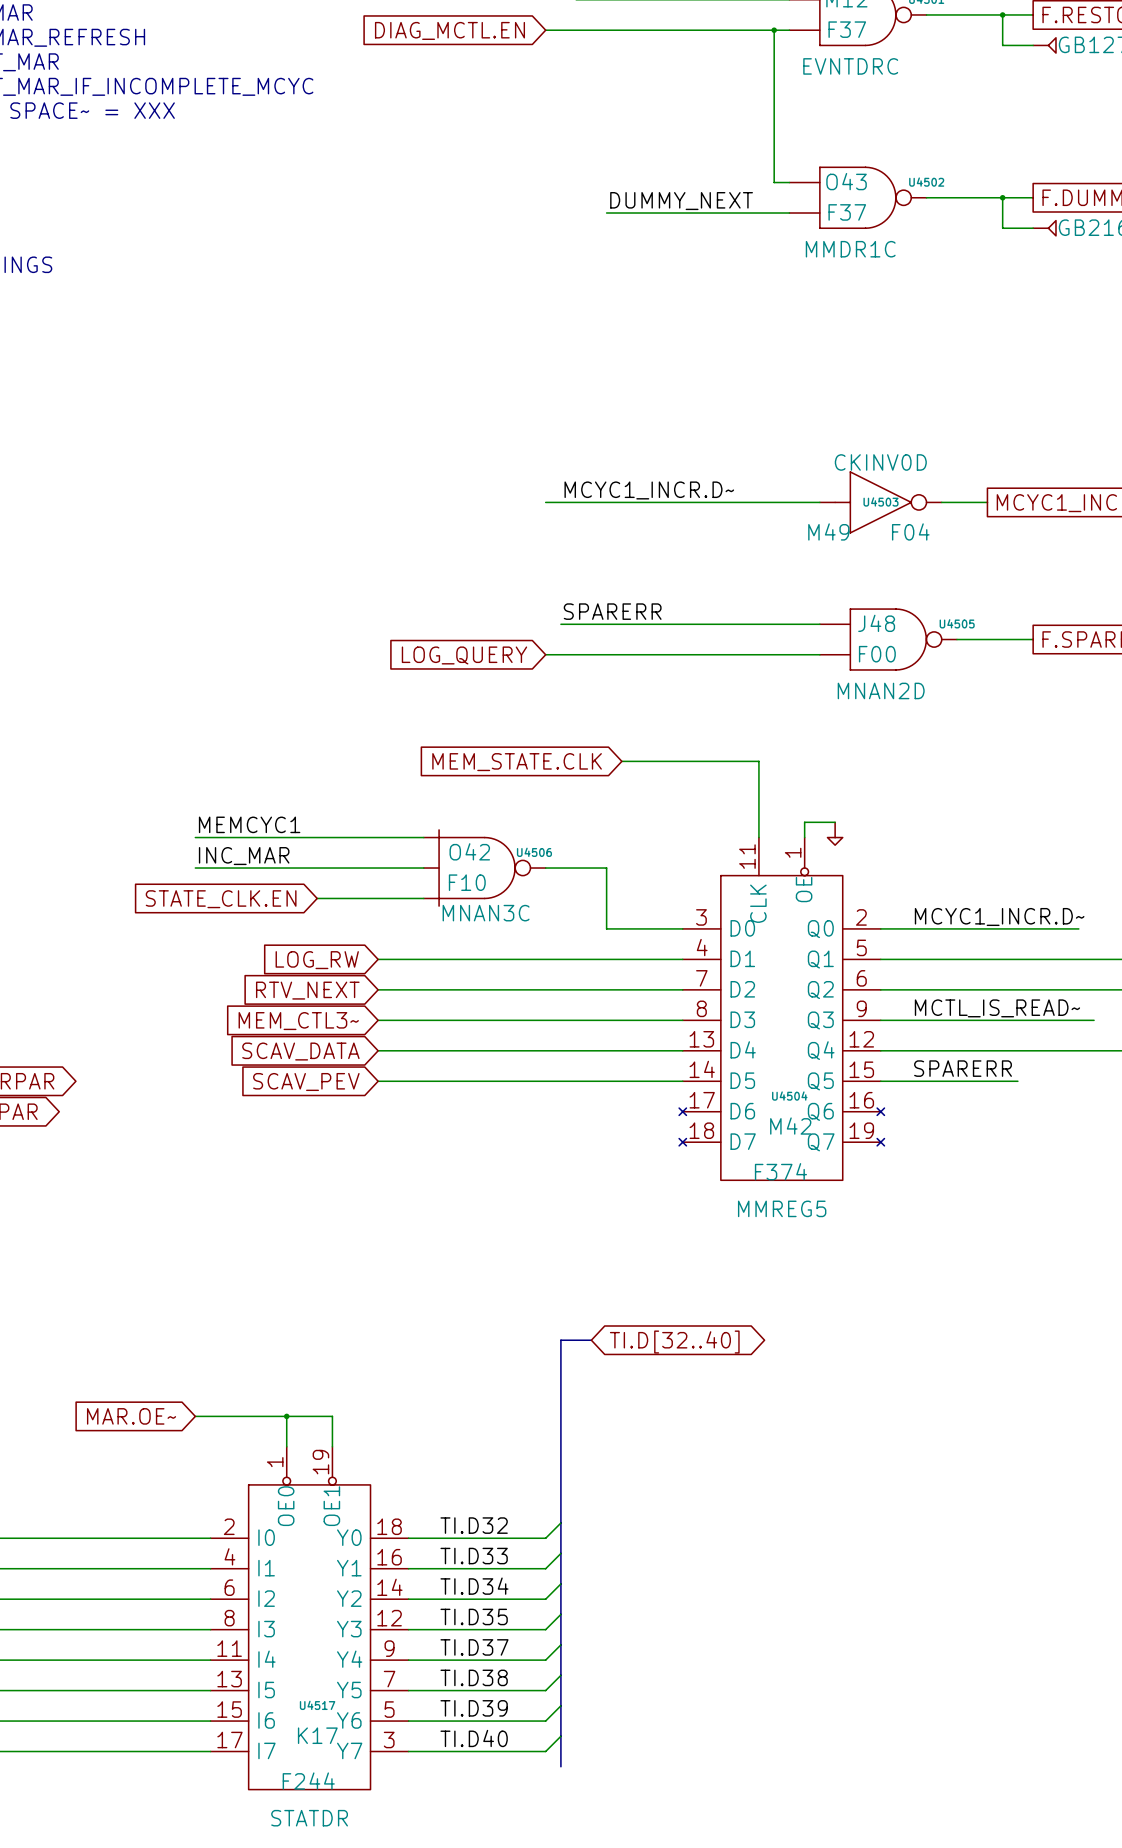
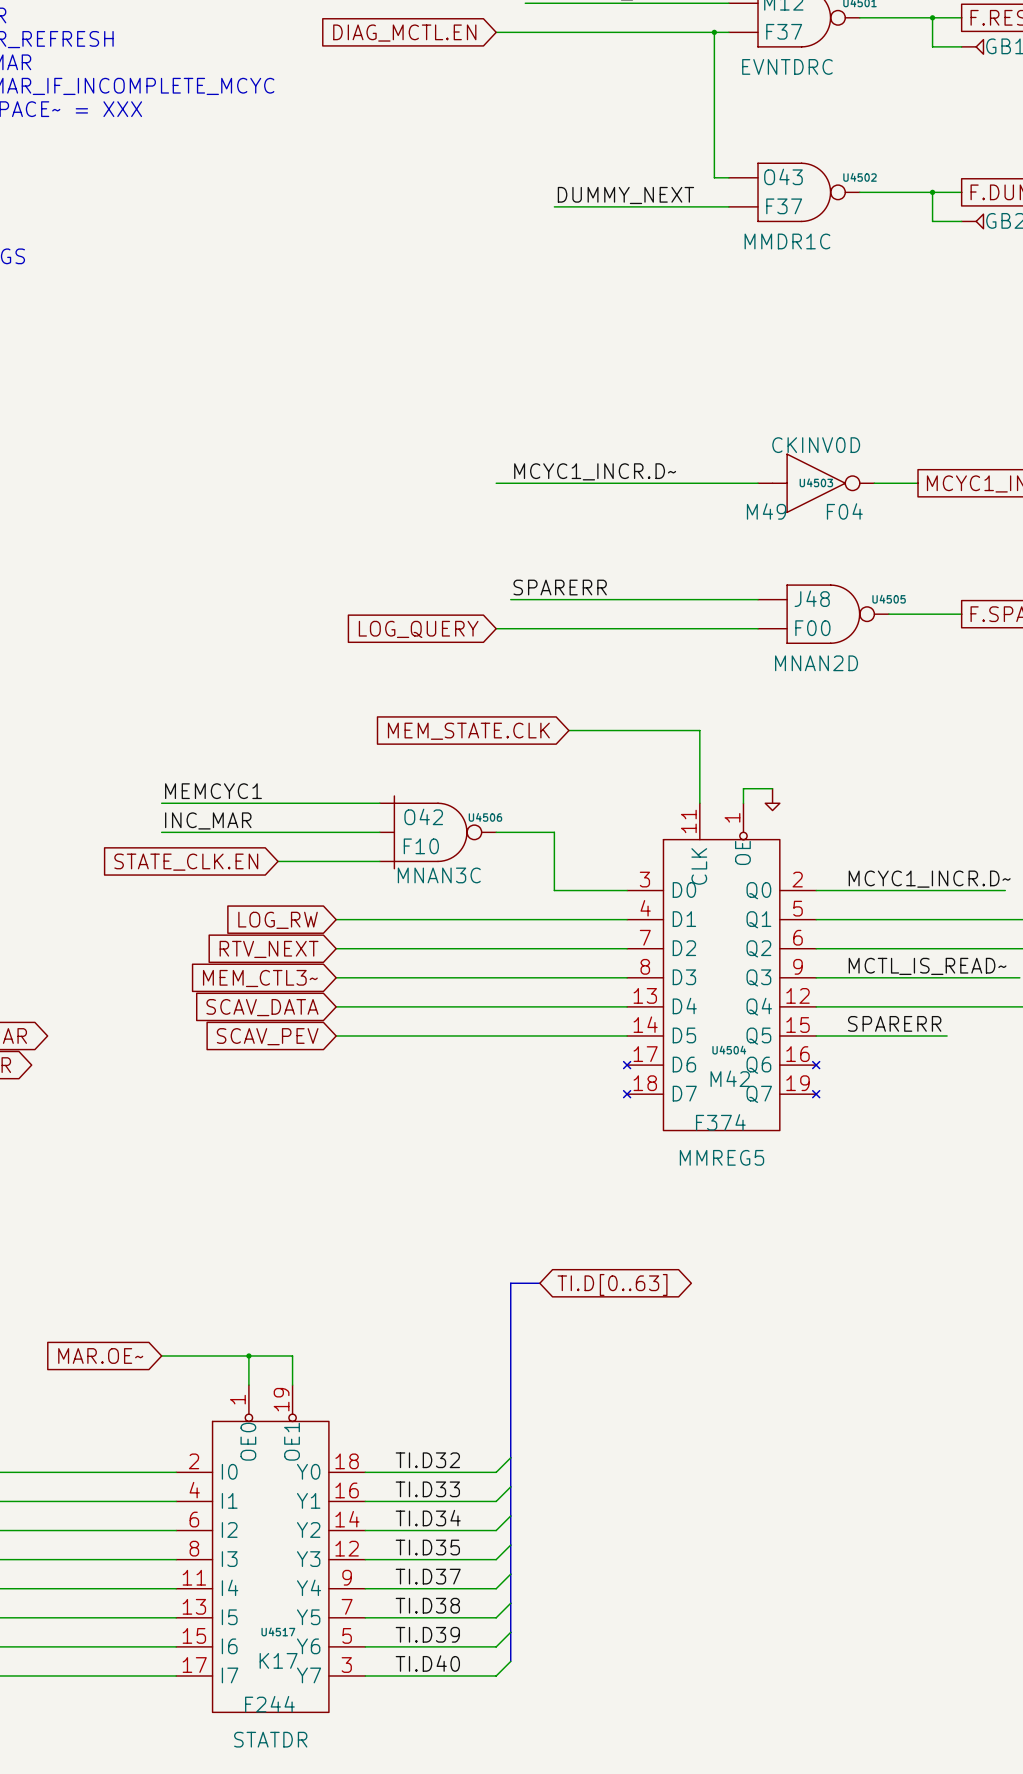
global label: TI.D[32..40] (674, 1342) -> TI.D[0..63] (612, 1284)
bus: (560, 1736) (560, 1766) -> none

